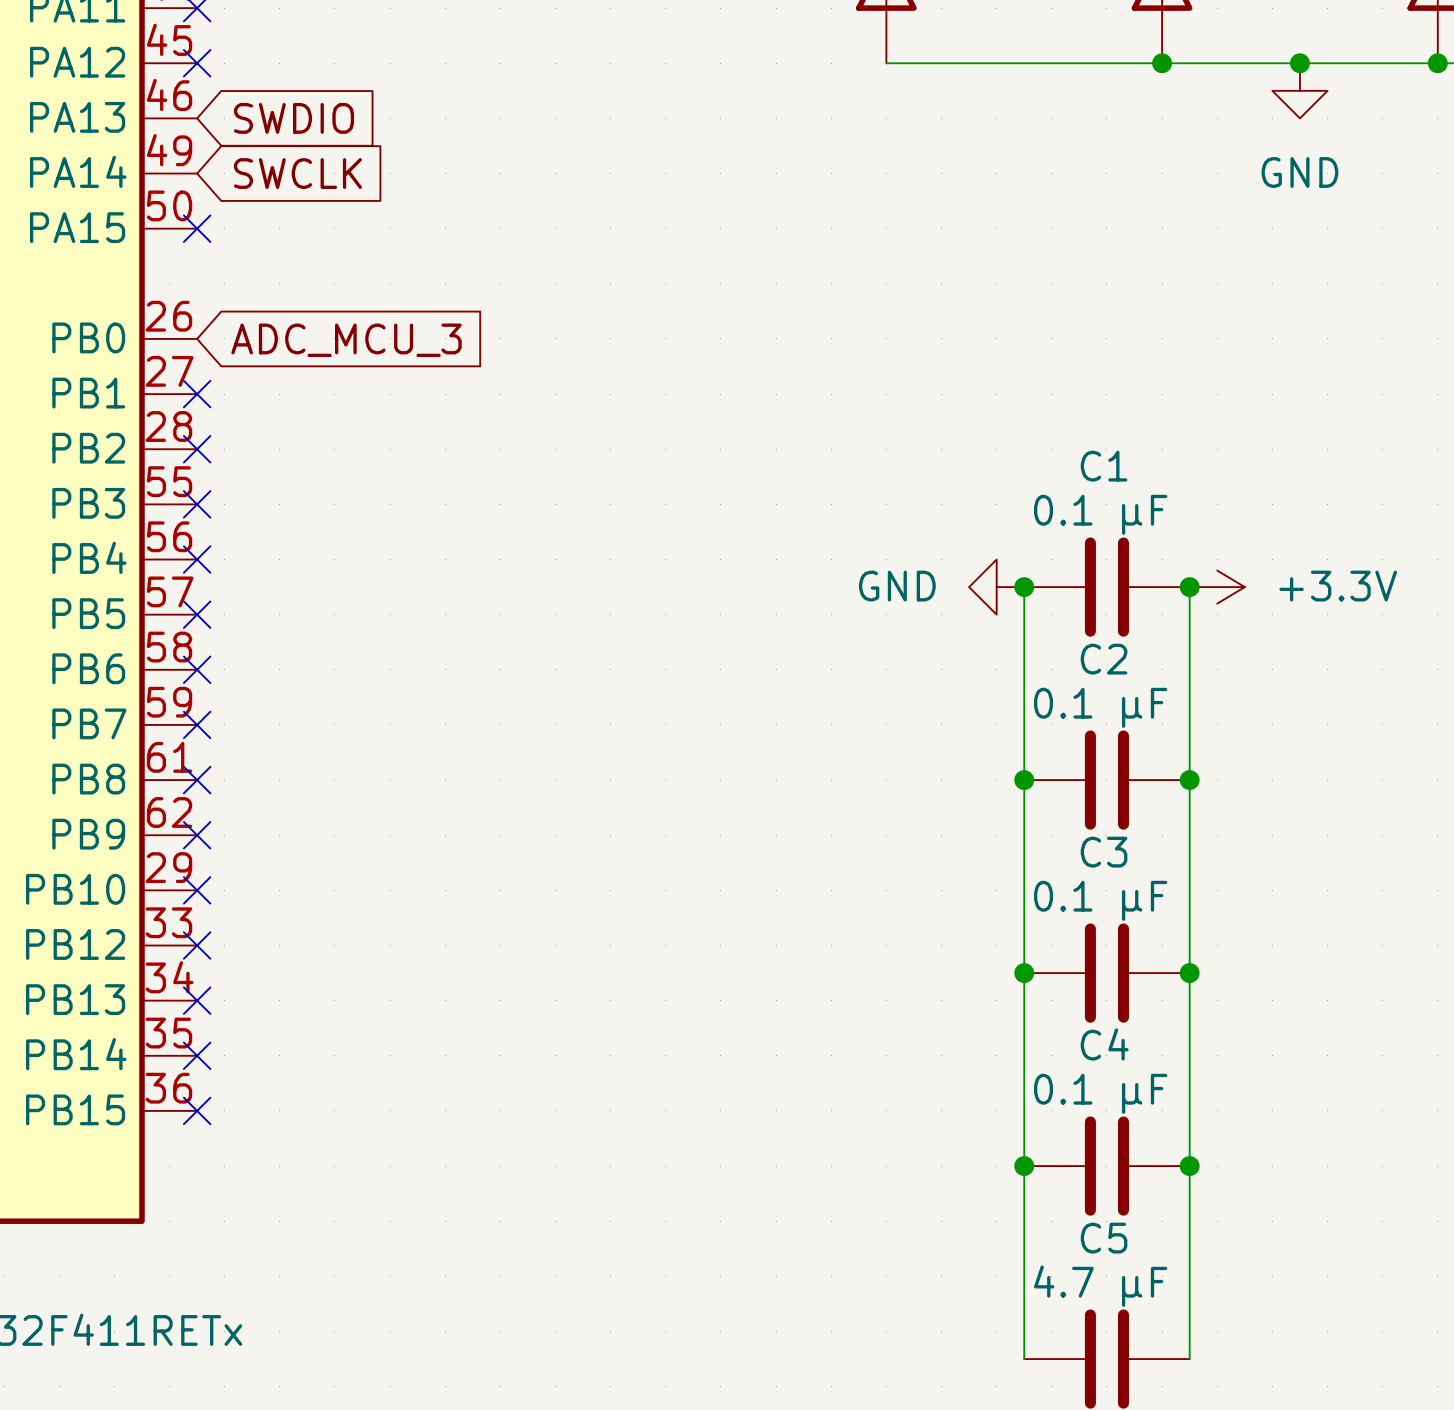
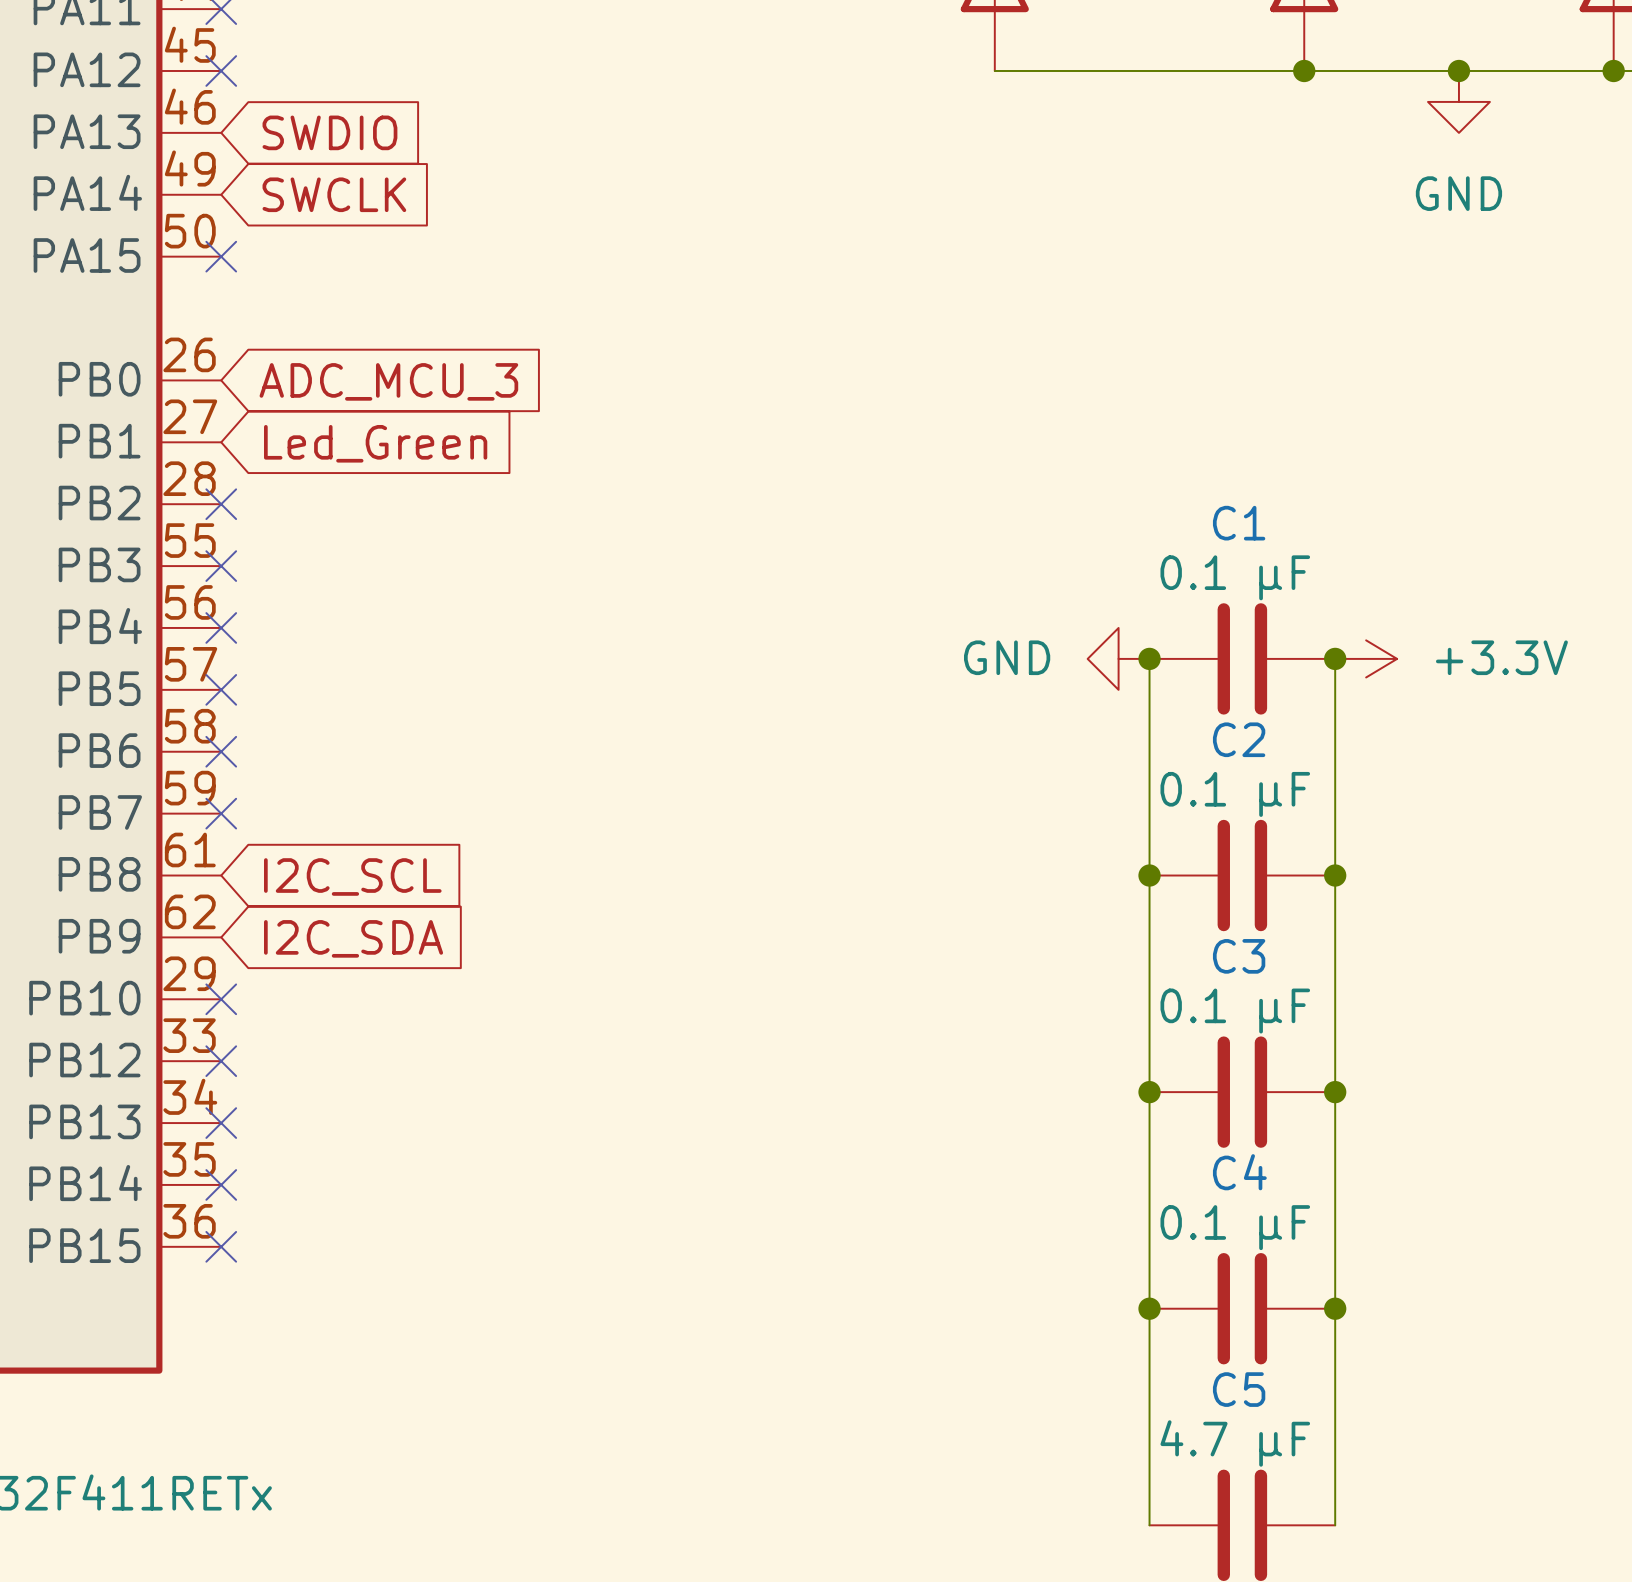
no-connect mark: (197, 394) -> none
global label: none -> Led_Green (375, 443)
no-connect mark: (197, 780) -> none
global label: none -> I2C_SCL (352, 876)
no-connect mark: (197, 835) -> none
global label: none -> I2C_SDA (353, 938)

